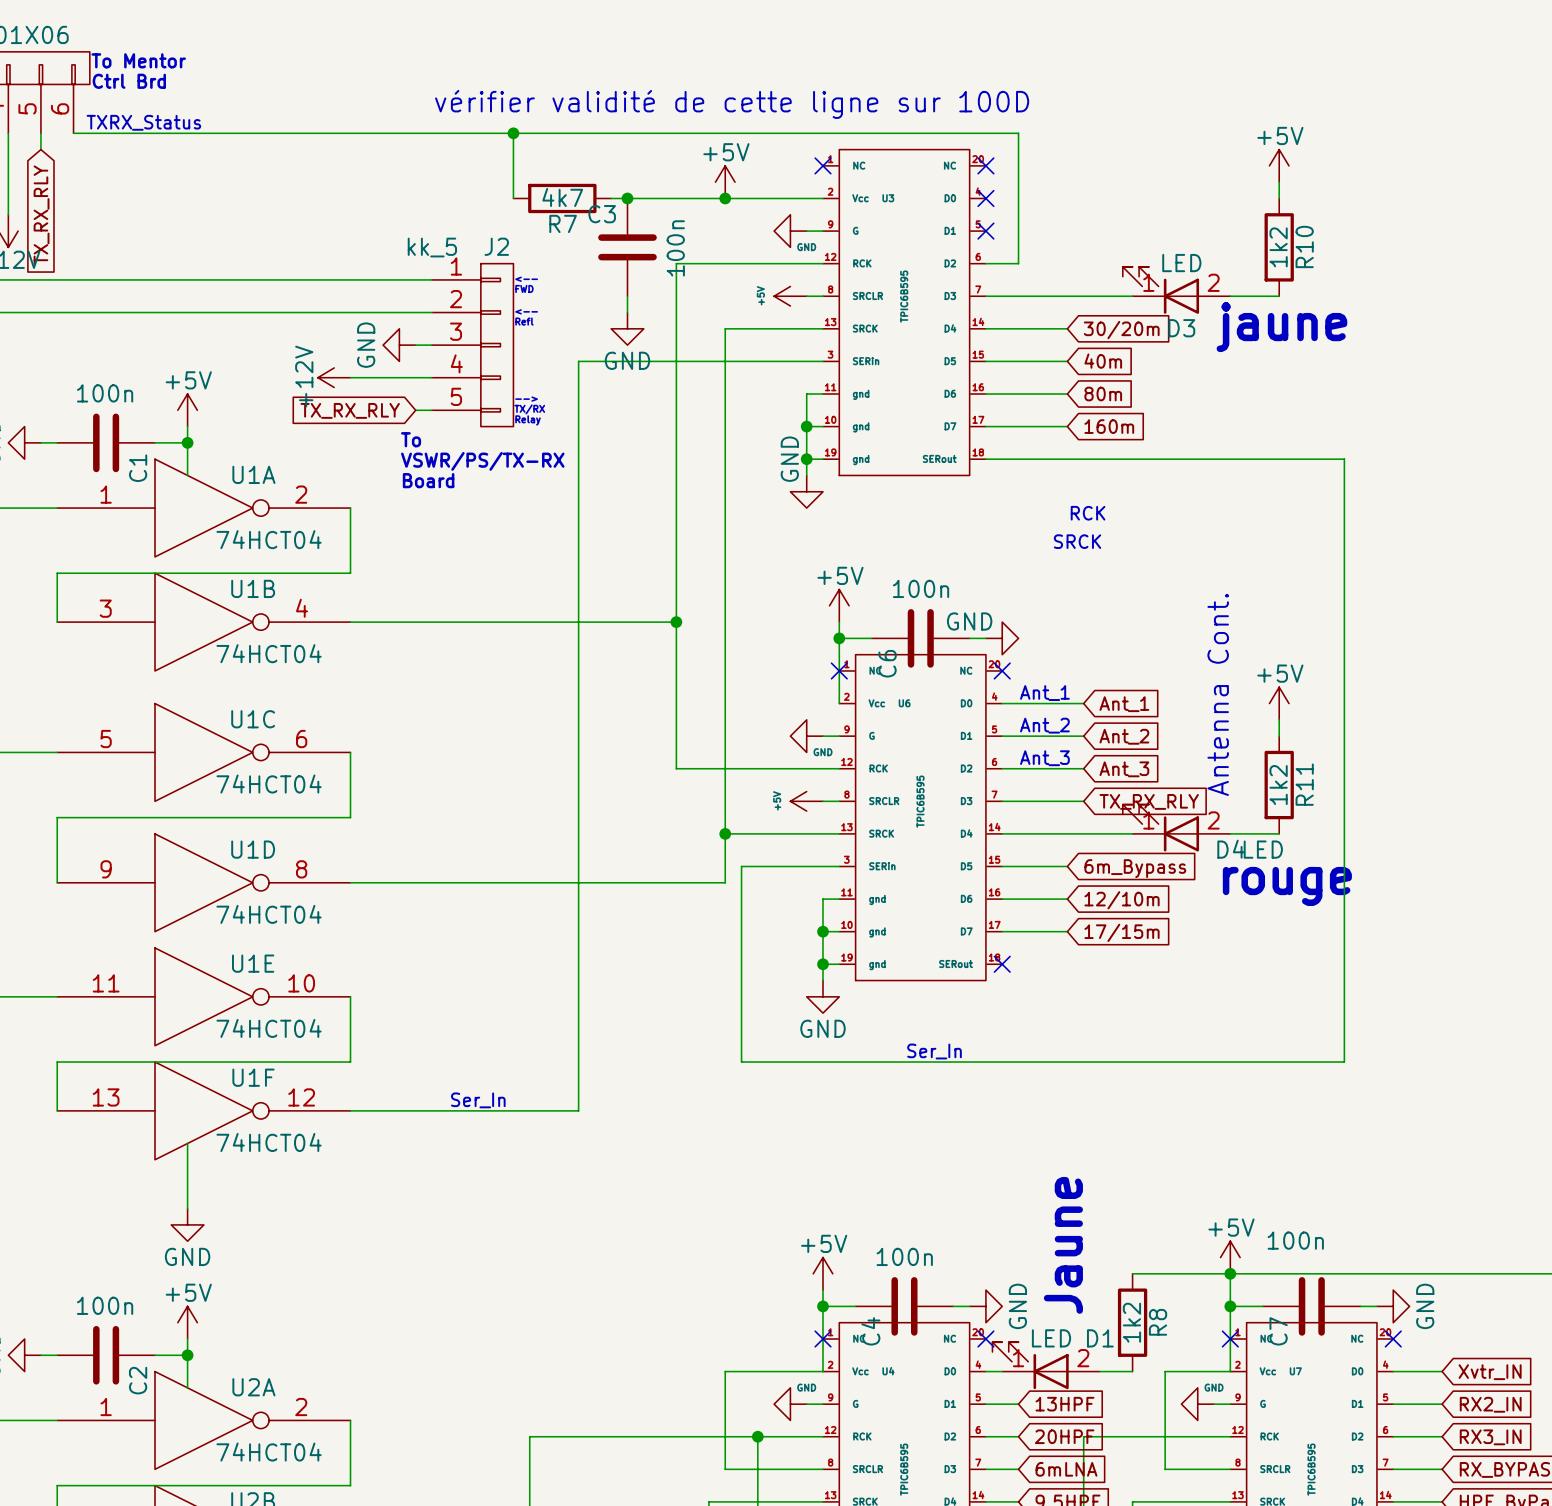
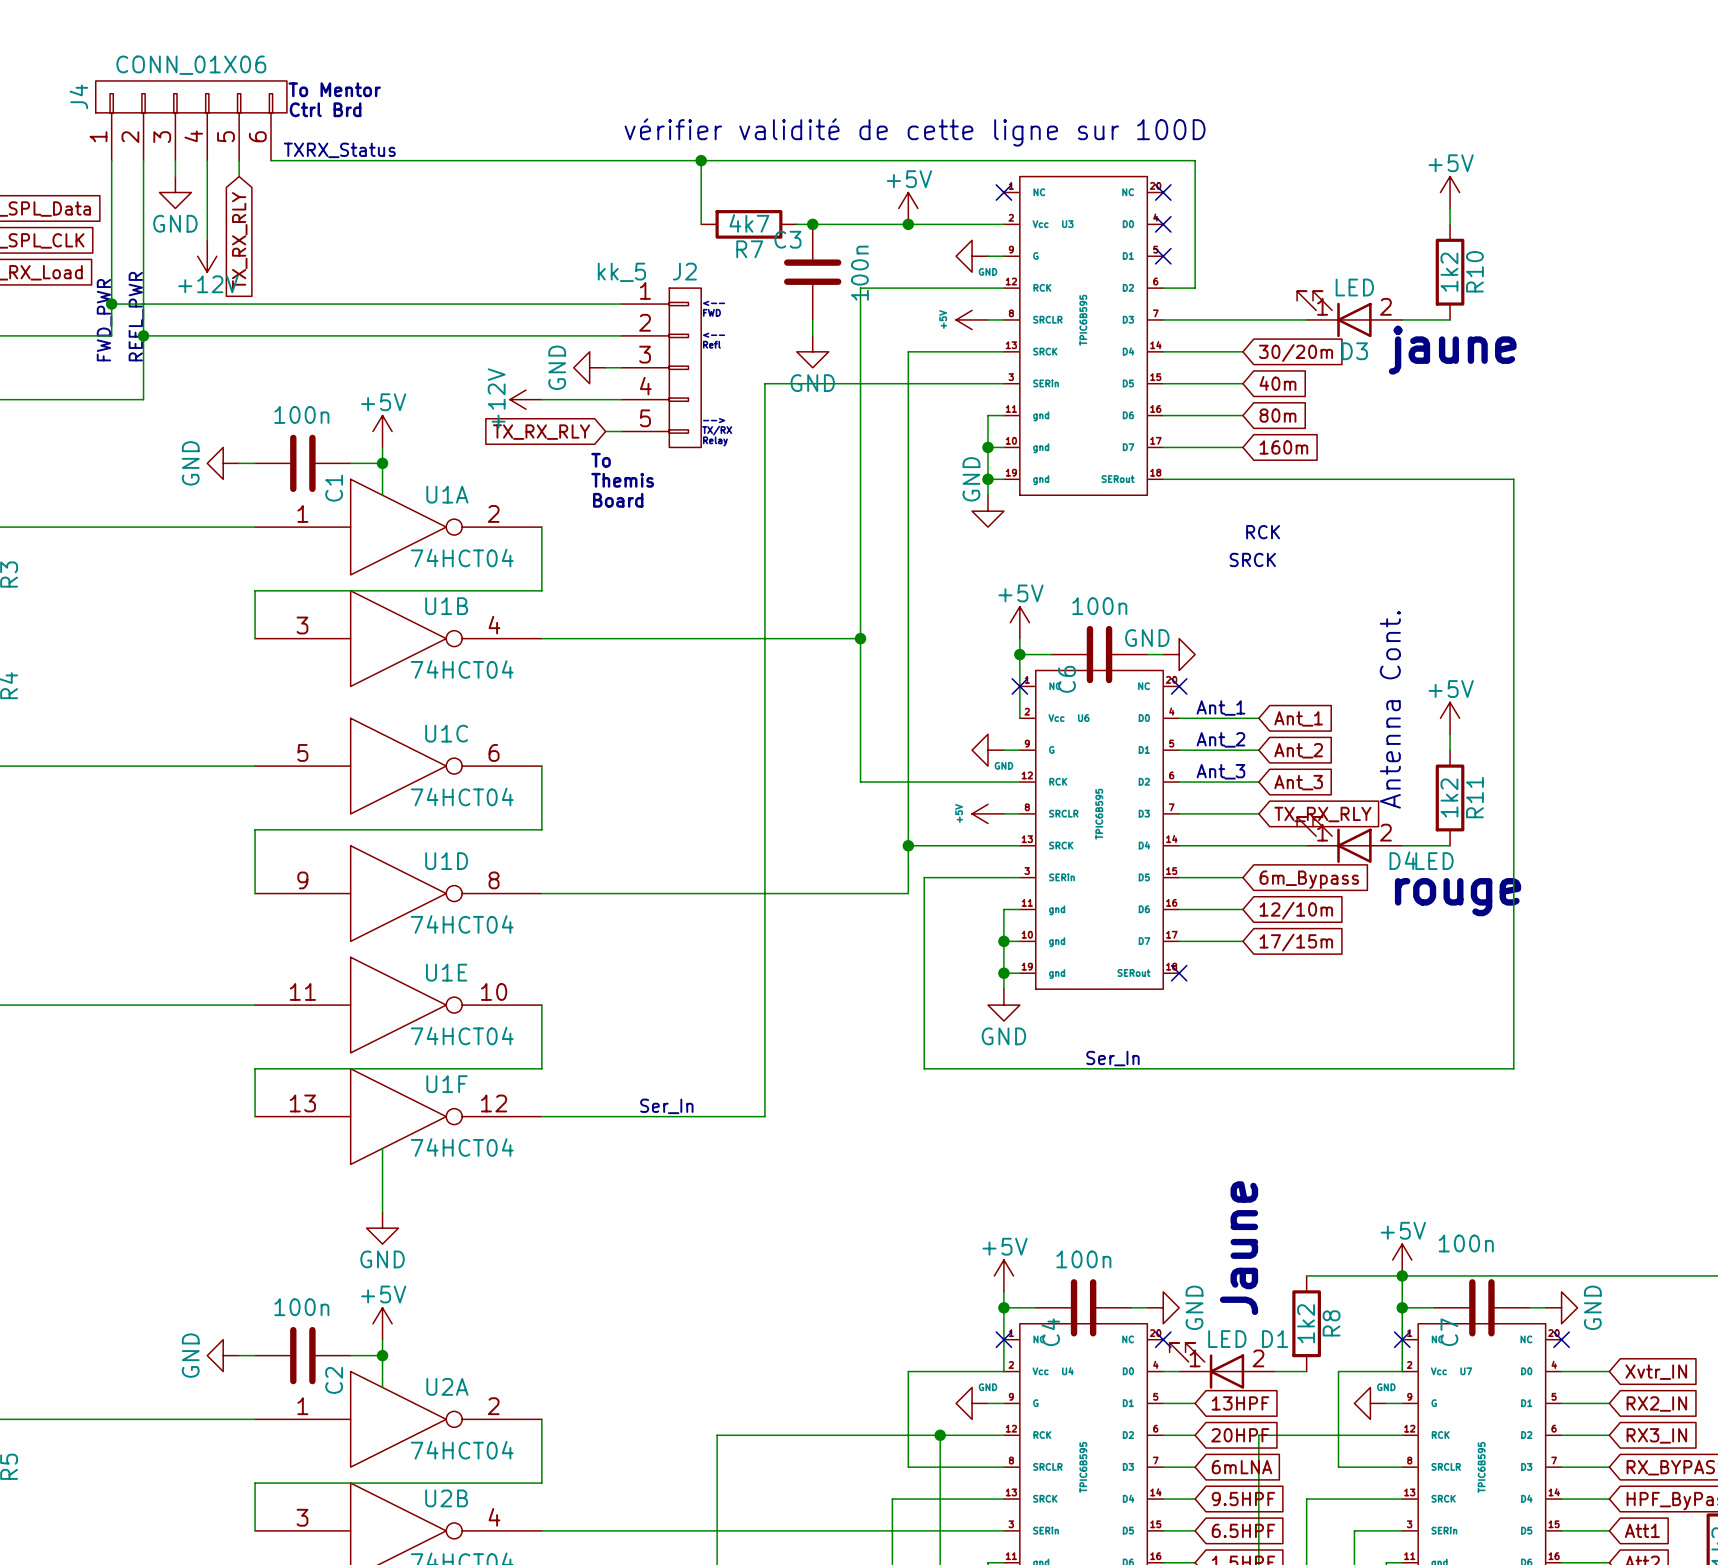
text: VSWR/PS/TX-RX (482, 461) -> Themis (622, 480)

